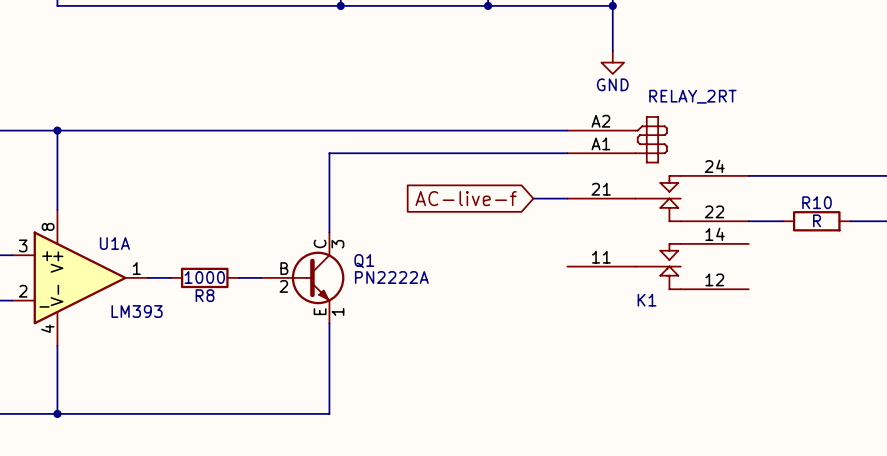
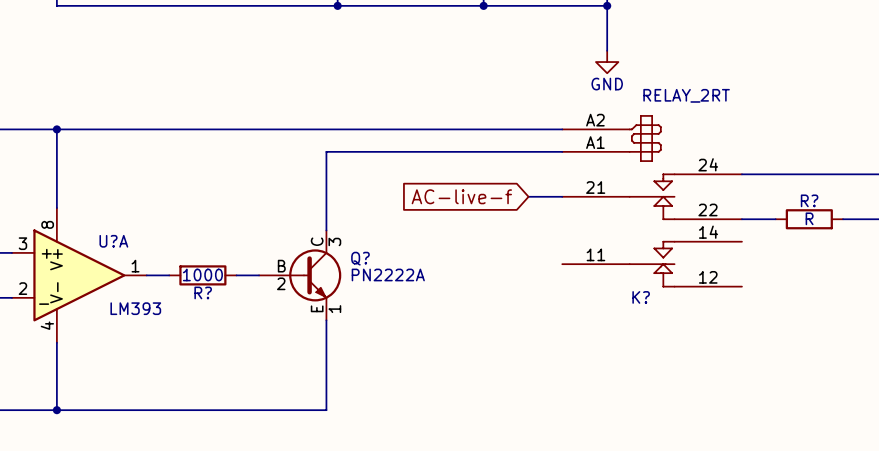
R10 name: R10 (817, 202) -> R? (809, 200)
U1A name: U1A (114, 243) -> U?A (113, 241)
Q1 name: Q1 (364, 261) -> Q? (360, 258)
R8 name: R8 (205, 295) -> R? (203, 292)
K1 name: K1 (647, 300) -> K? (641, 297)

